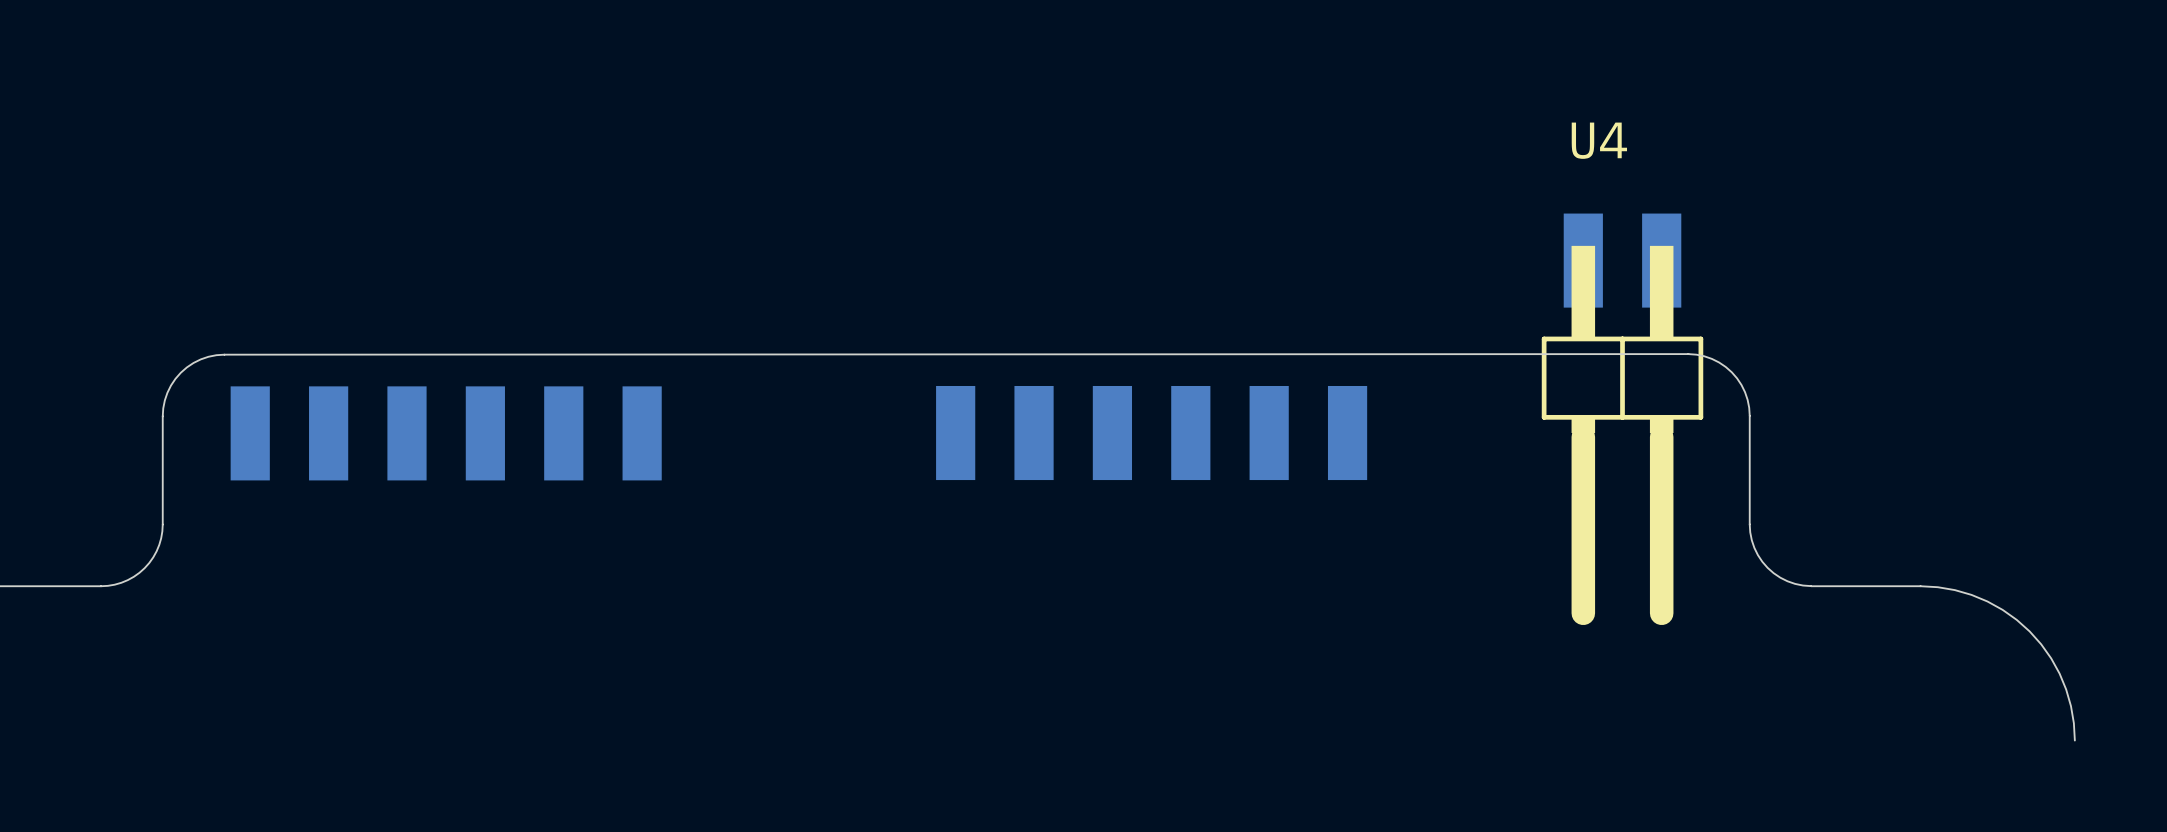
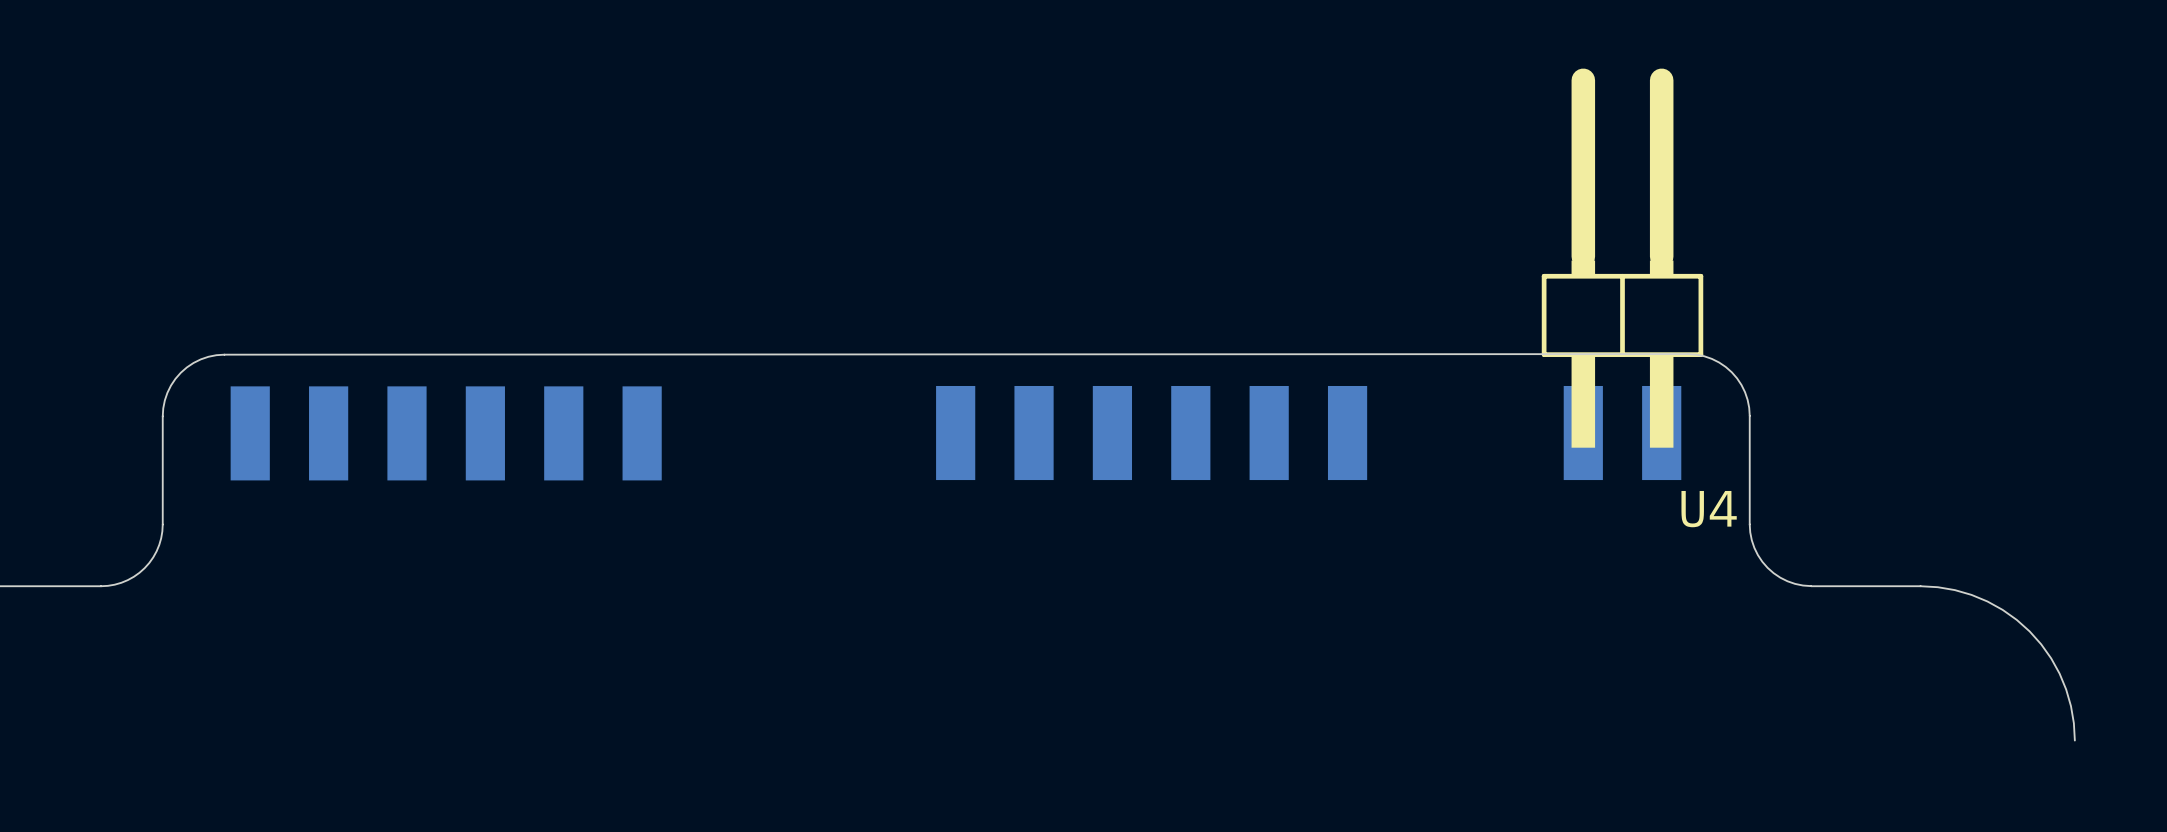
U4 name position: U4 (1599, 140) -> U4 (1709, 509)
U4 rotation: 0° (1622, 419) -> 180° (1622, 274)

